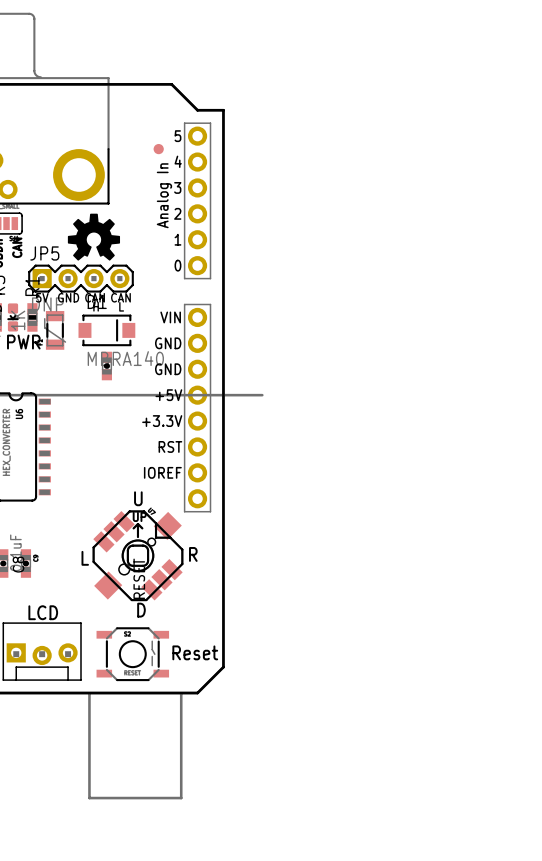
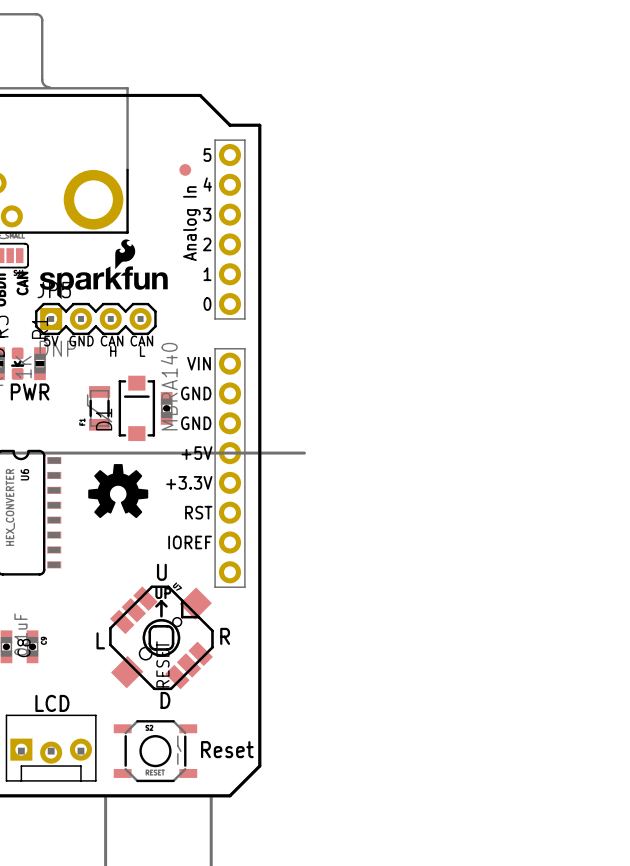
drawing: none -> [39, 239, 168, 300]
drawing position: (93, 237) -> (118, 491)
part position: (55, 330) -> (99, 408)
D1 rotation: 0° (106, 330) -> 90° counterclockwise (136, 408)
part position: (106, 366) -> (166, 408)

